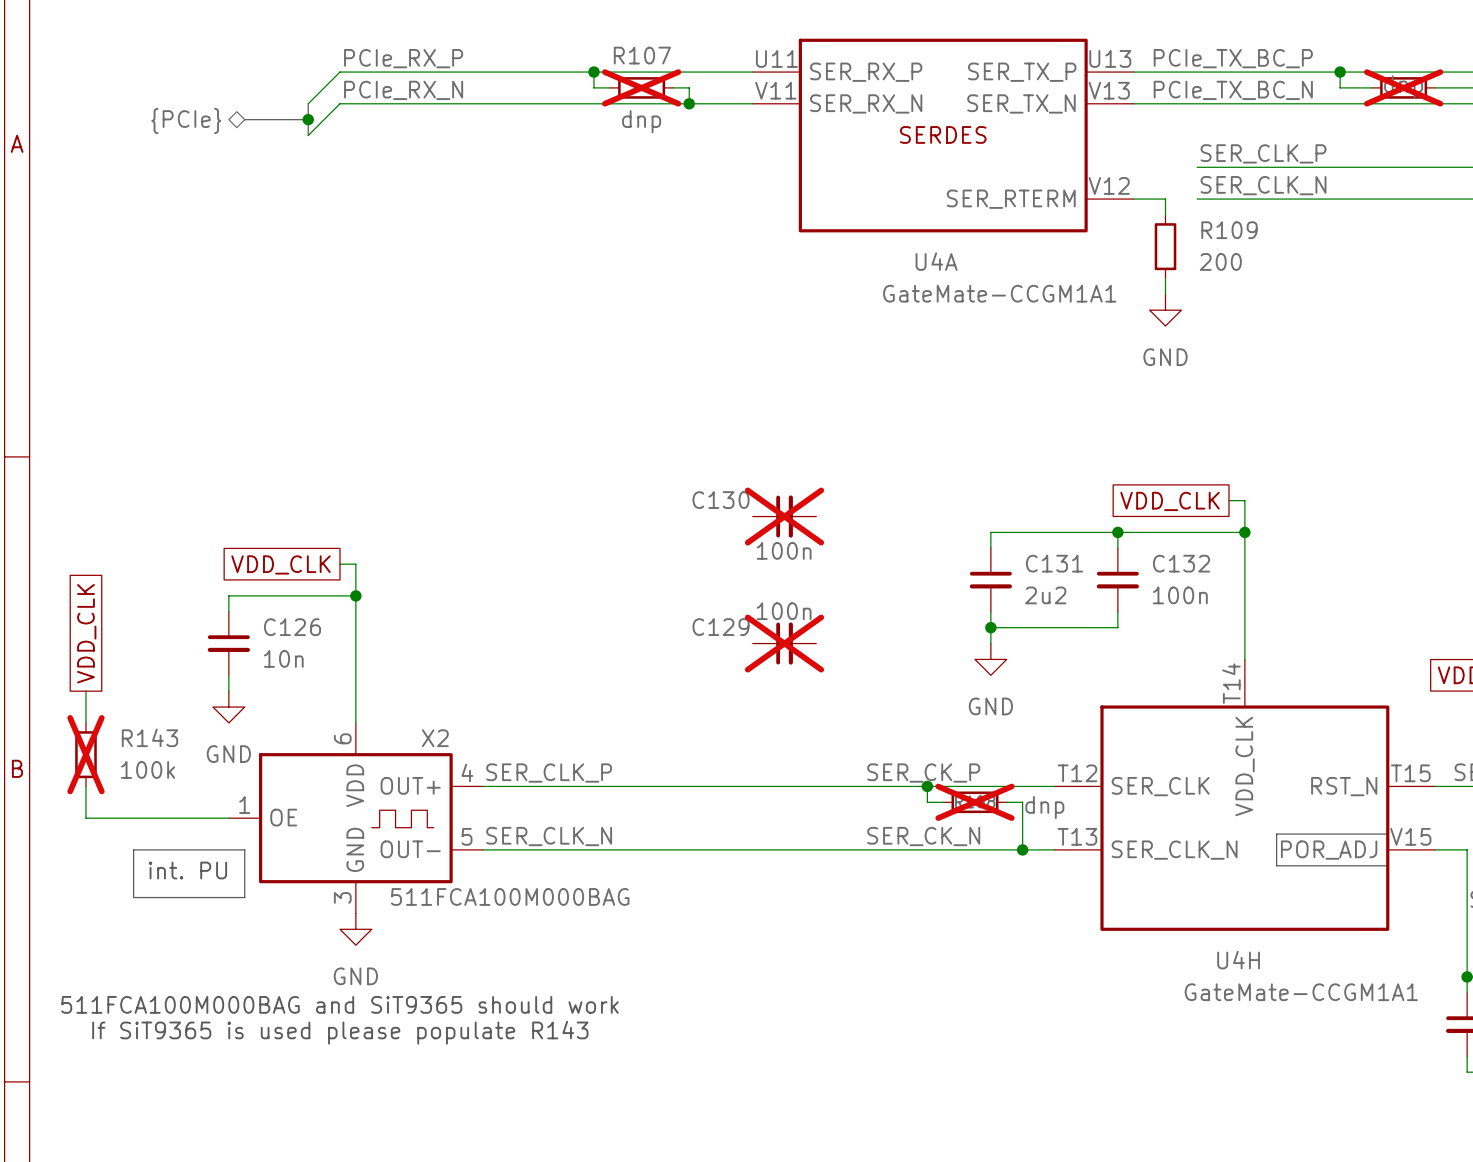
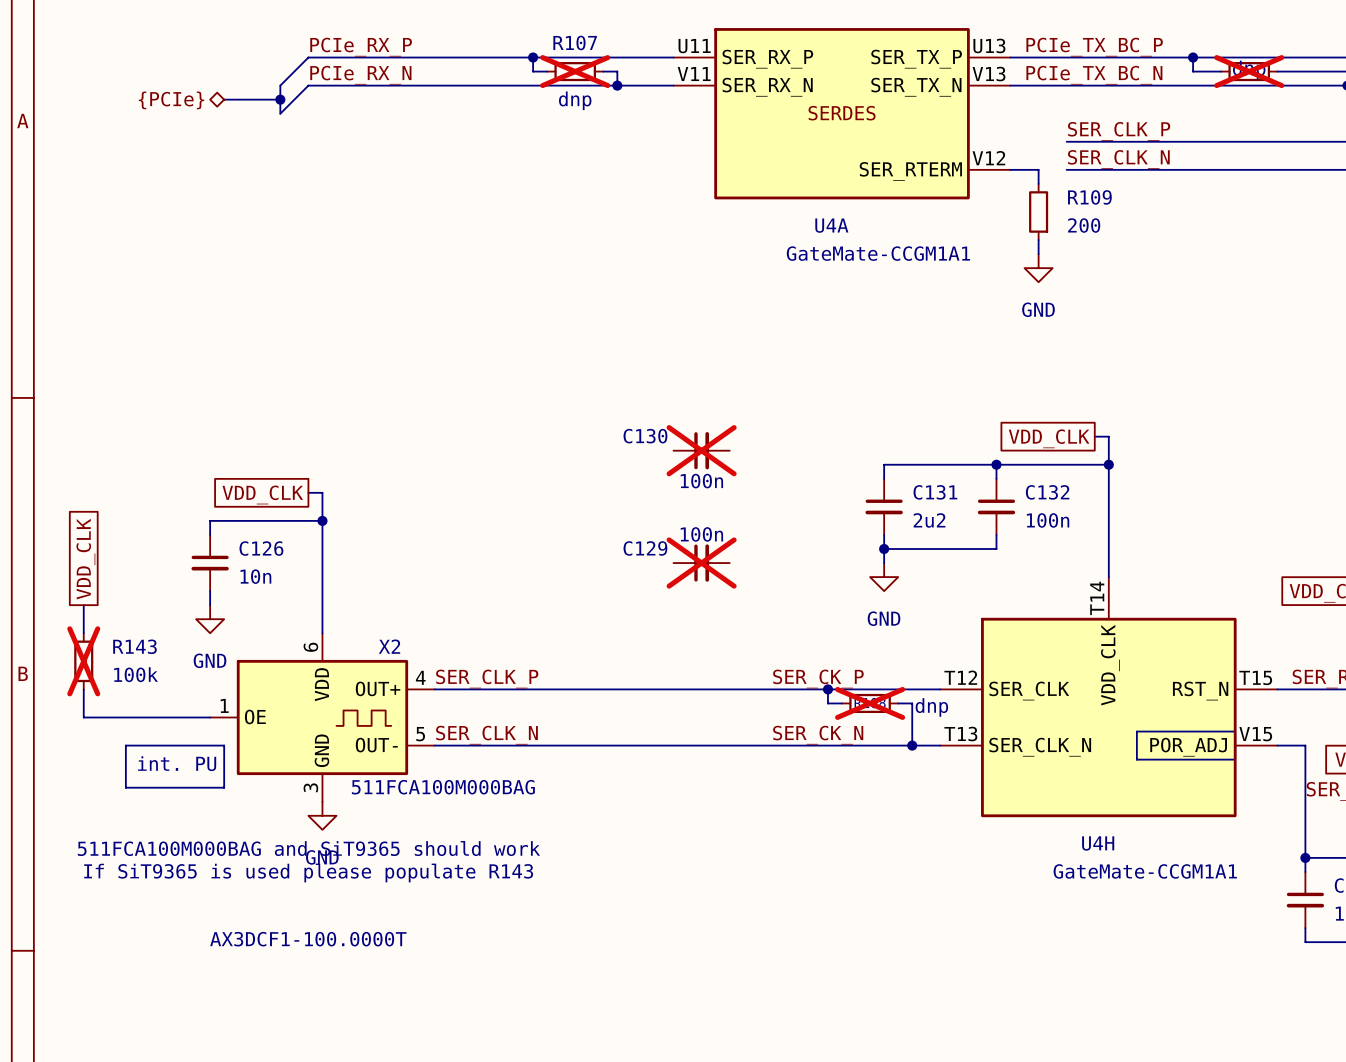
text position: 511FCA100M000BAG and SiT9365 should work (339, 1004) -> 511FCA100M000BAG and SiT9365 should work (308, 848)
text position: If SiT9365 is used please populate R143 (340, 1032) -> If SiT9365 is used please populate R143 (308, 872)
text: none -> AX3DCF1-100.0000T (308, 939)

